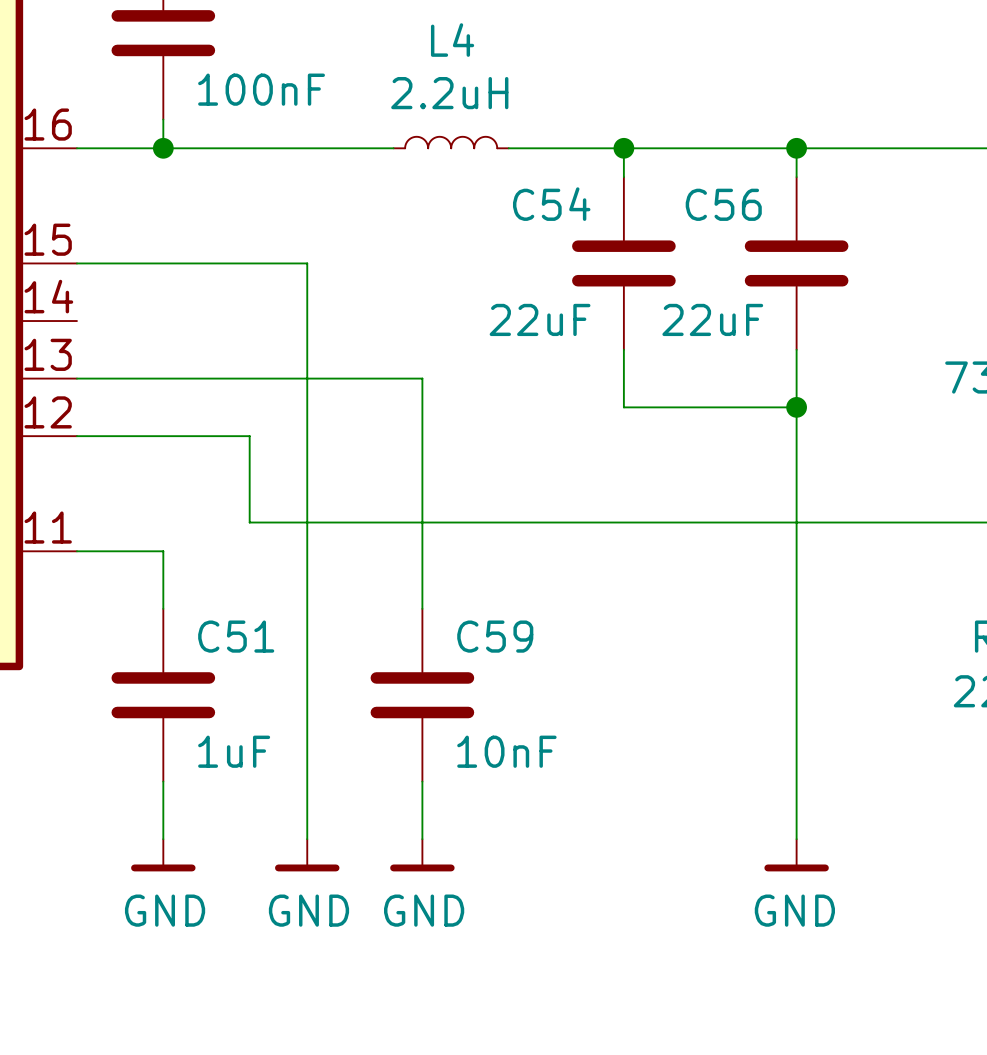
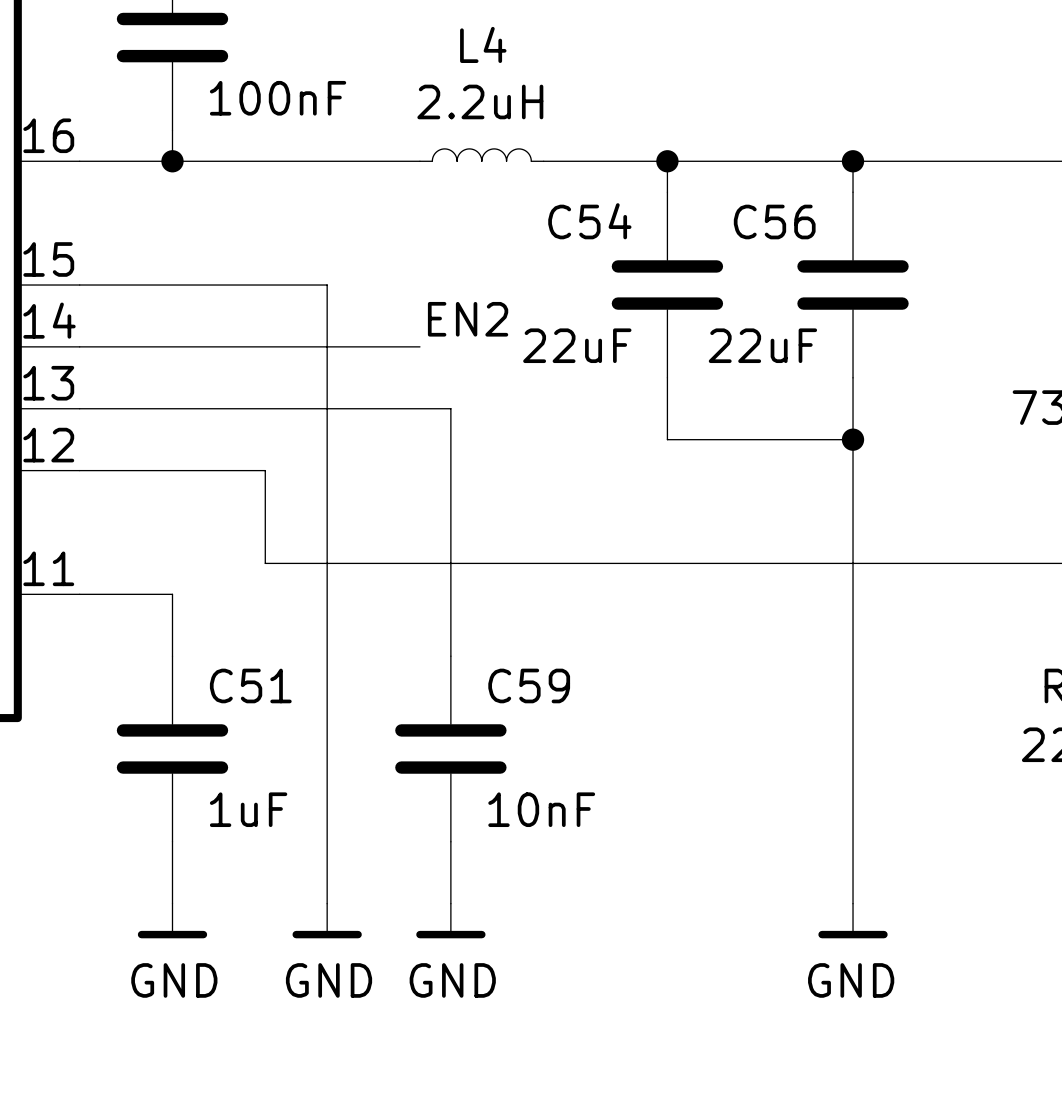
label: none -> EN2 (468, 319)
wire: none -> (79, 346) (419, 346)

